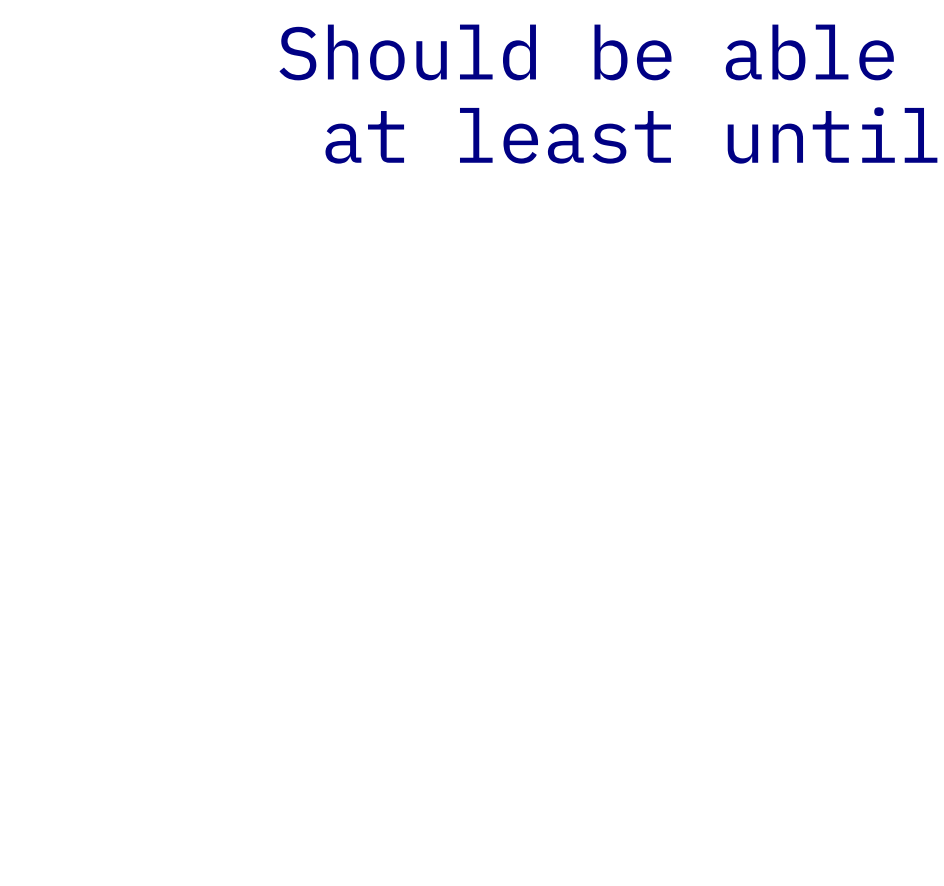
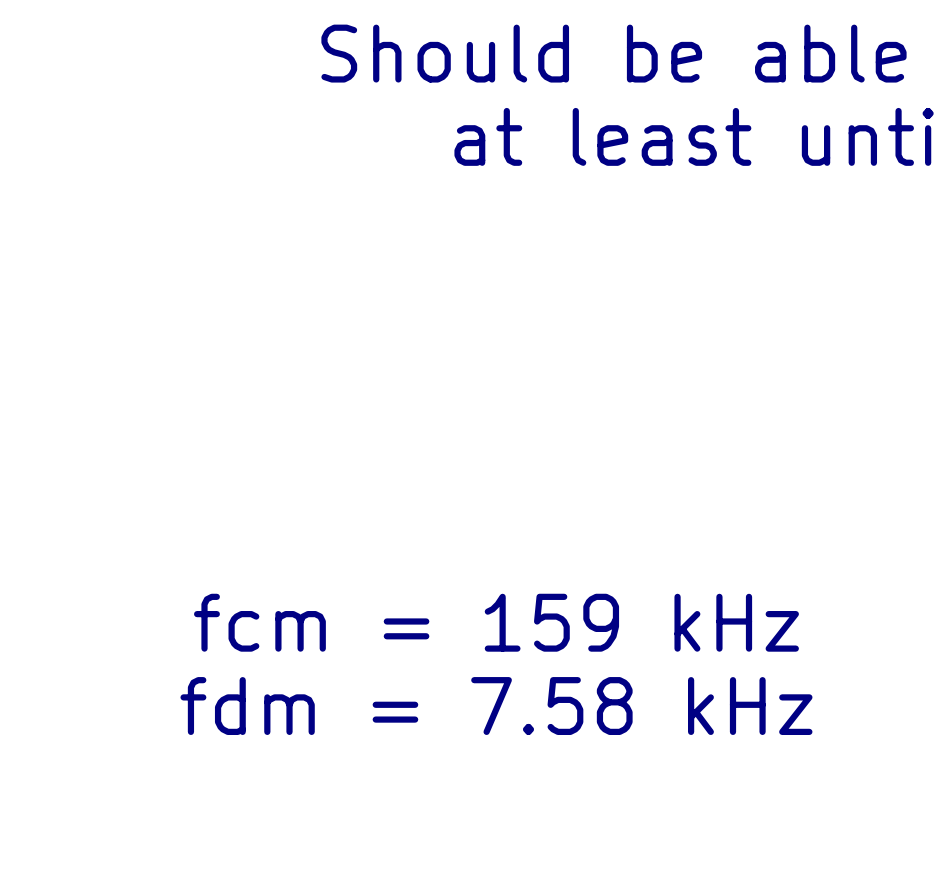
text: none -> fcm = 159 kHz (496, 622)
text: none -> fdm = 7.58 kHz (496, 706)

